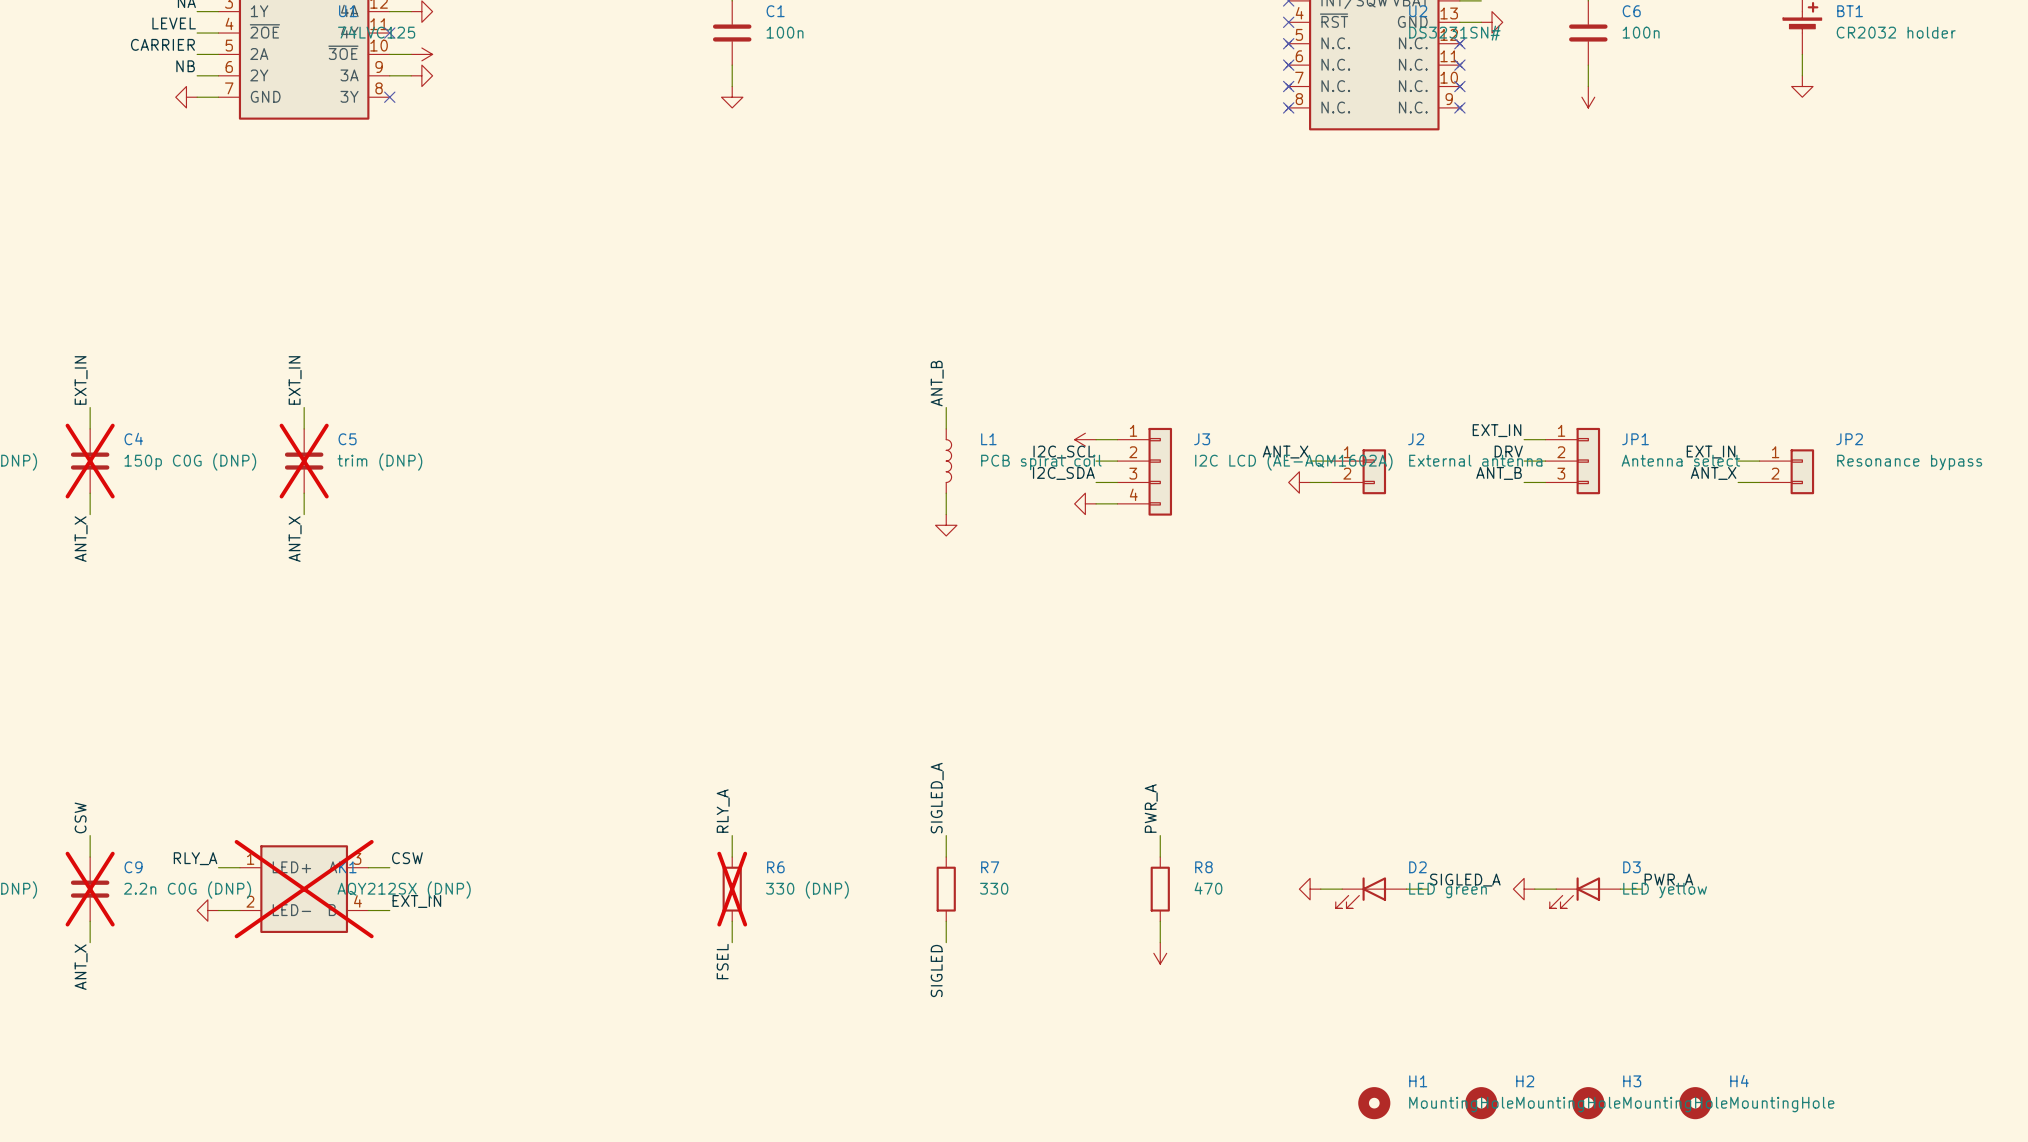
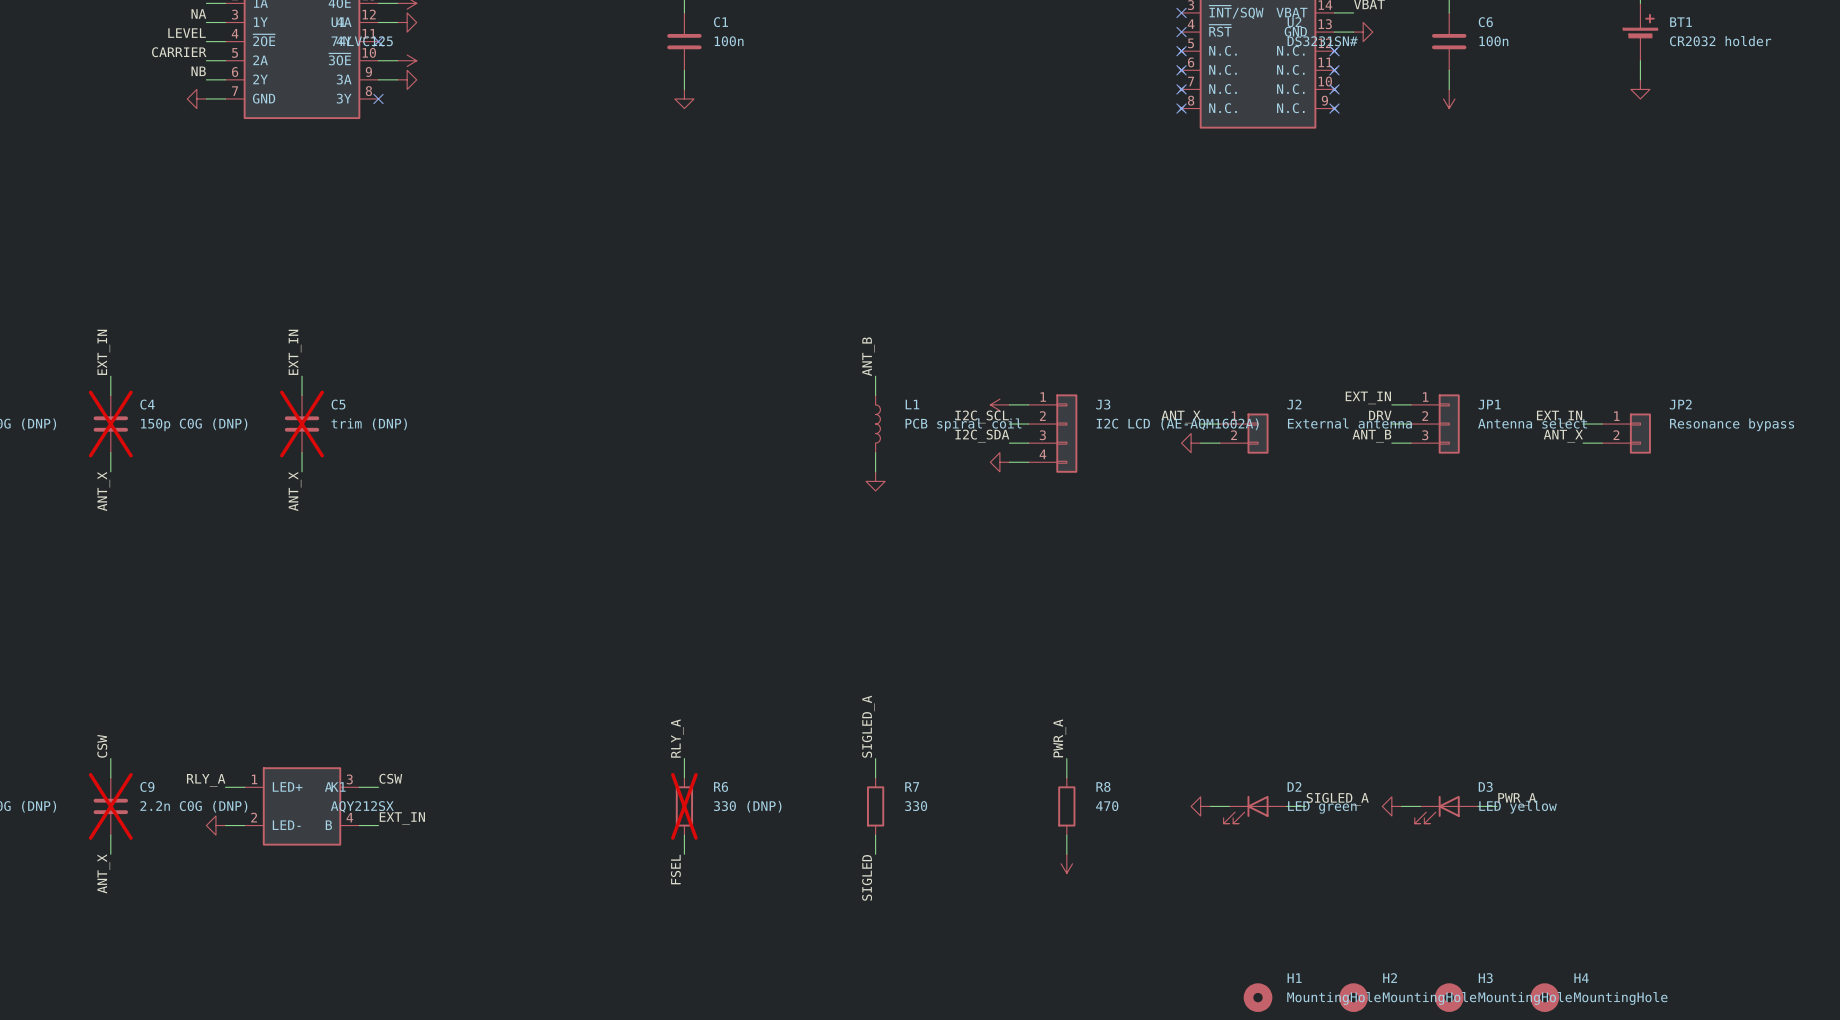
K1 do-not-place cross: (304, 889) -> none
K1 value: AQY212SX (DNP) (404, 889) -> AQY212SX (362, 806)

